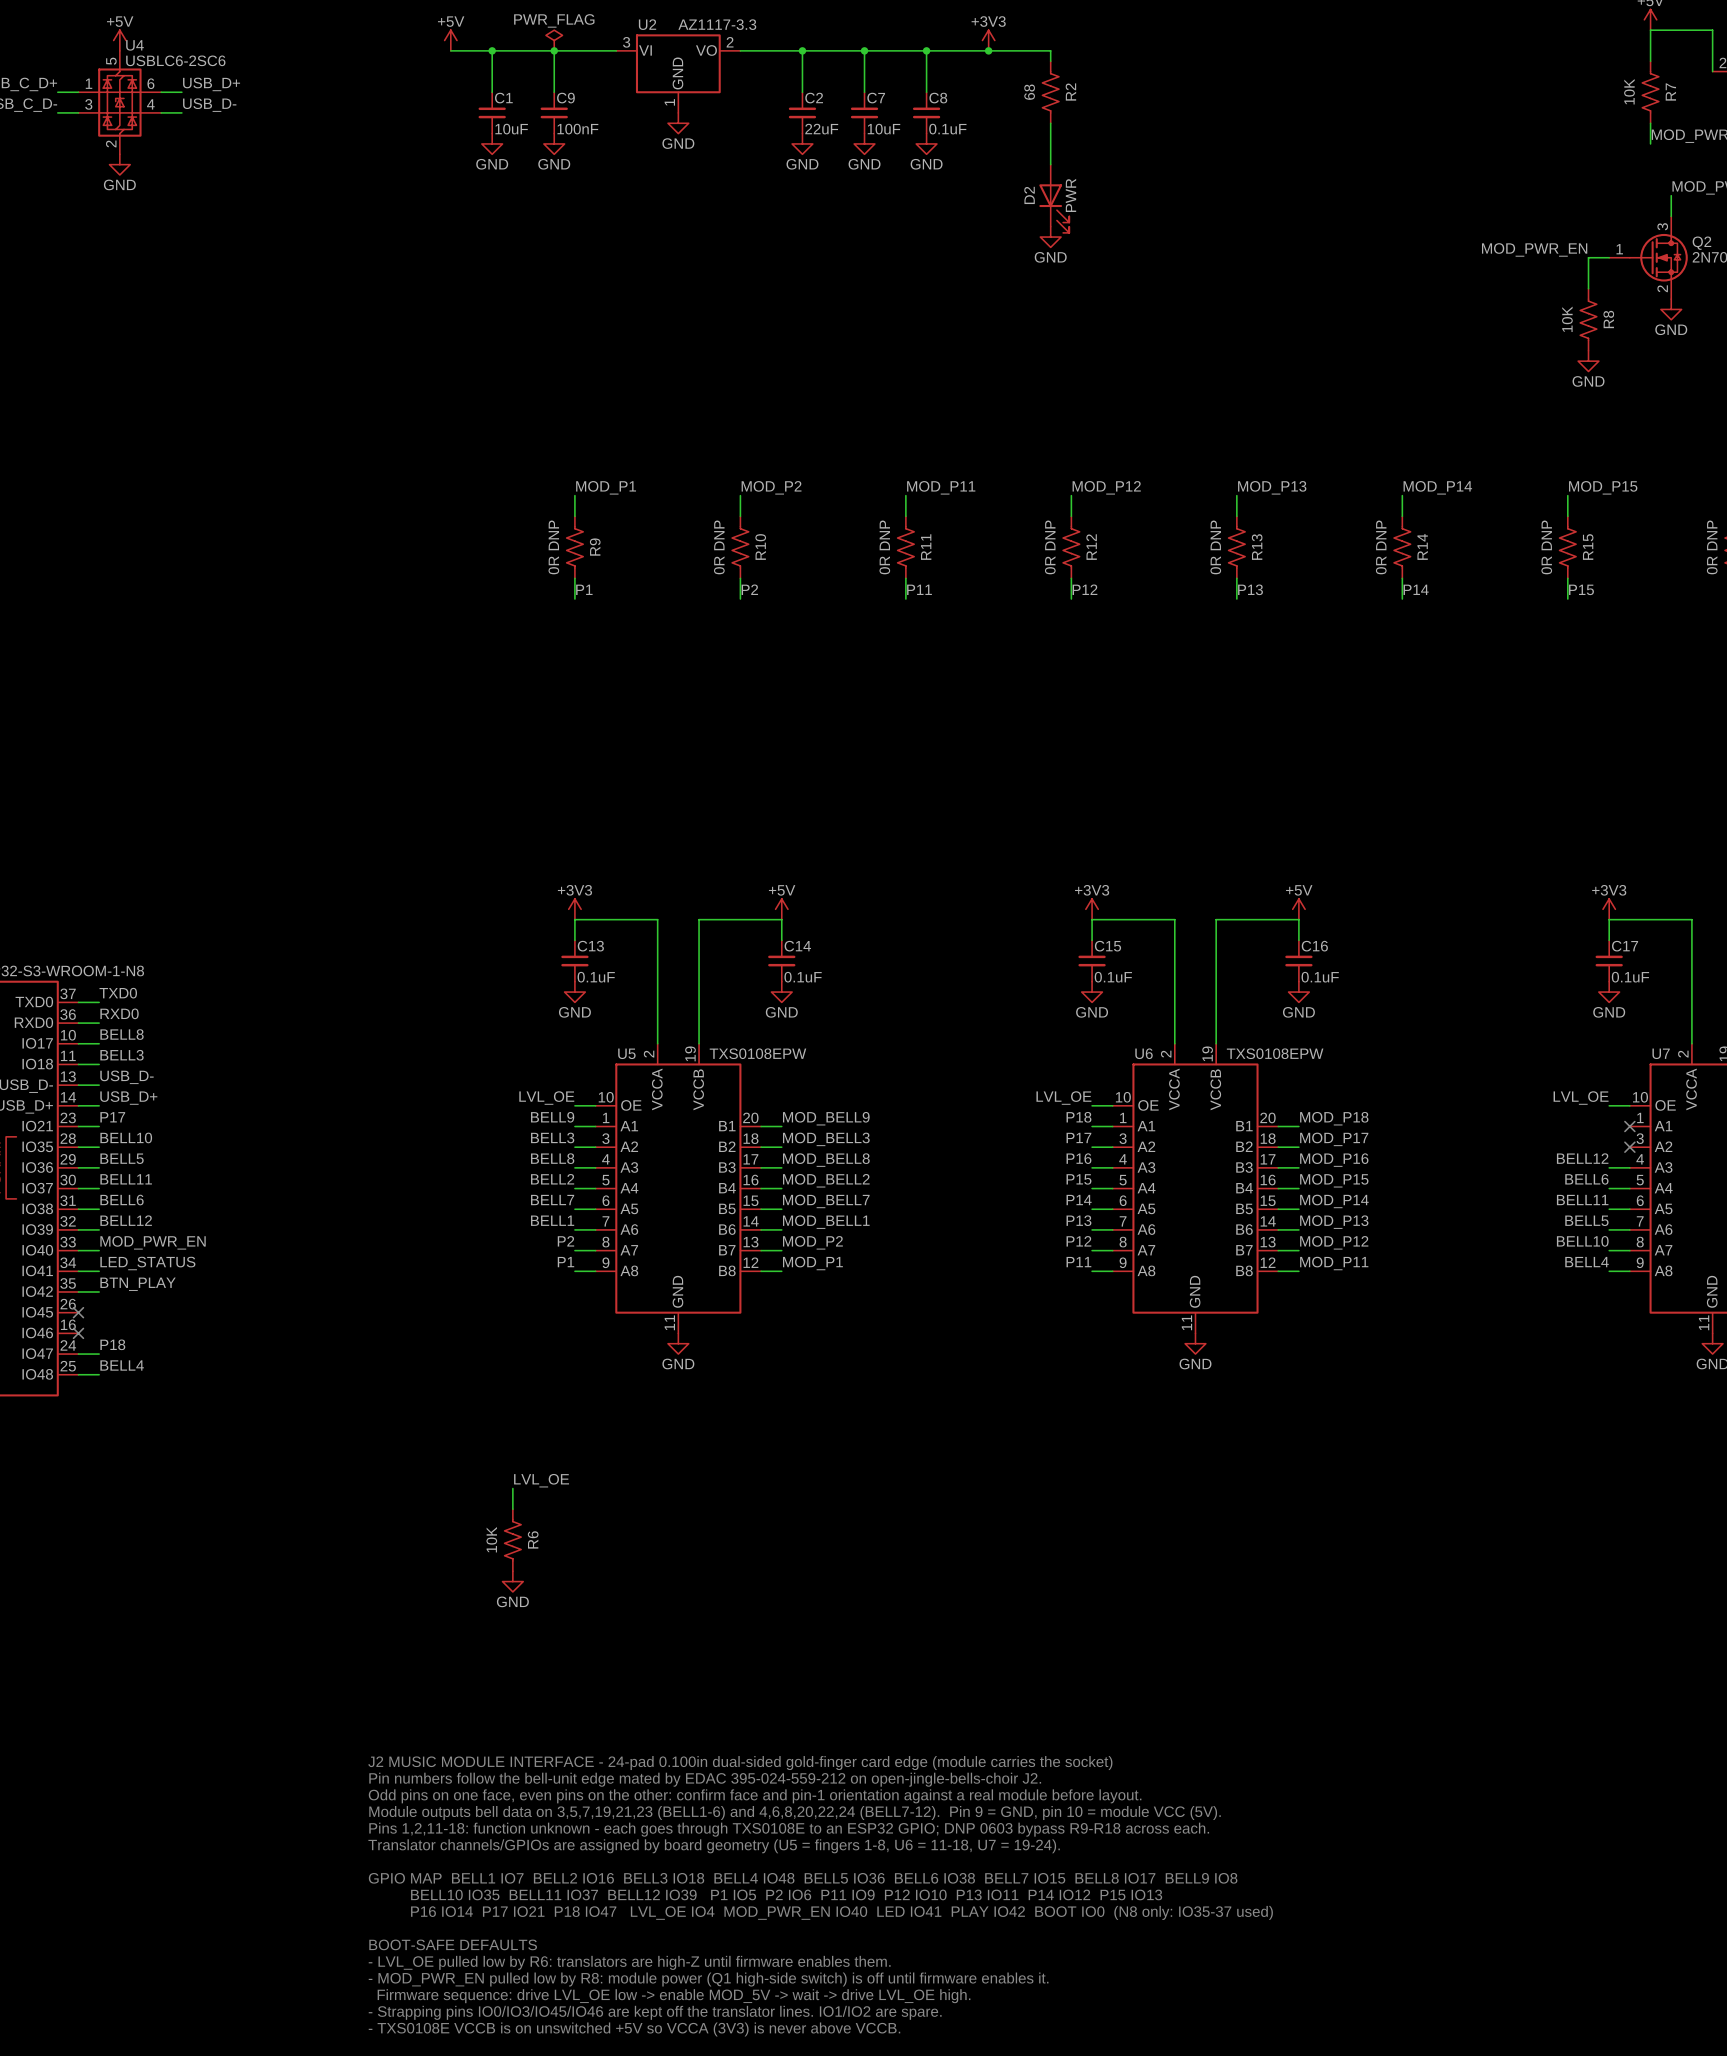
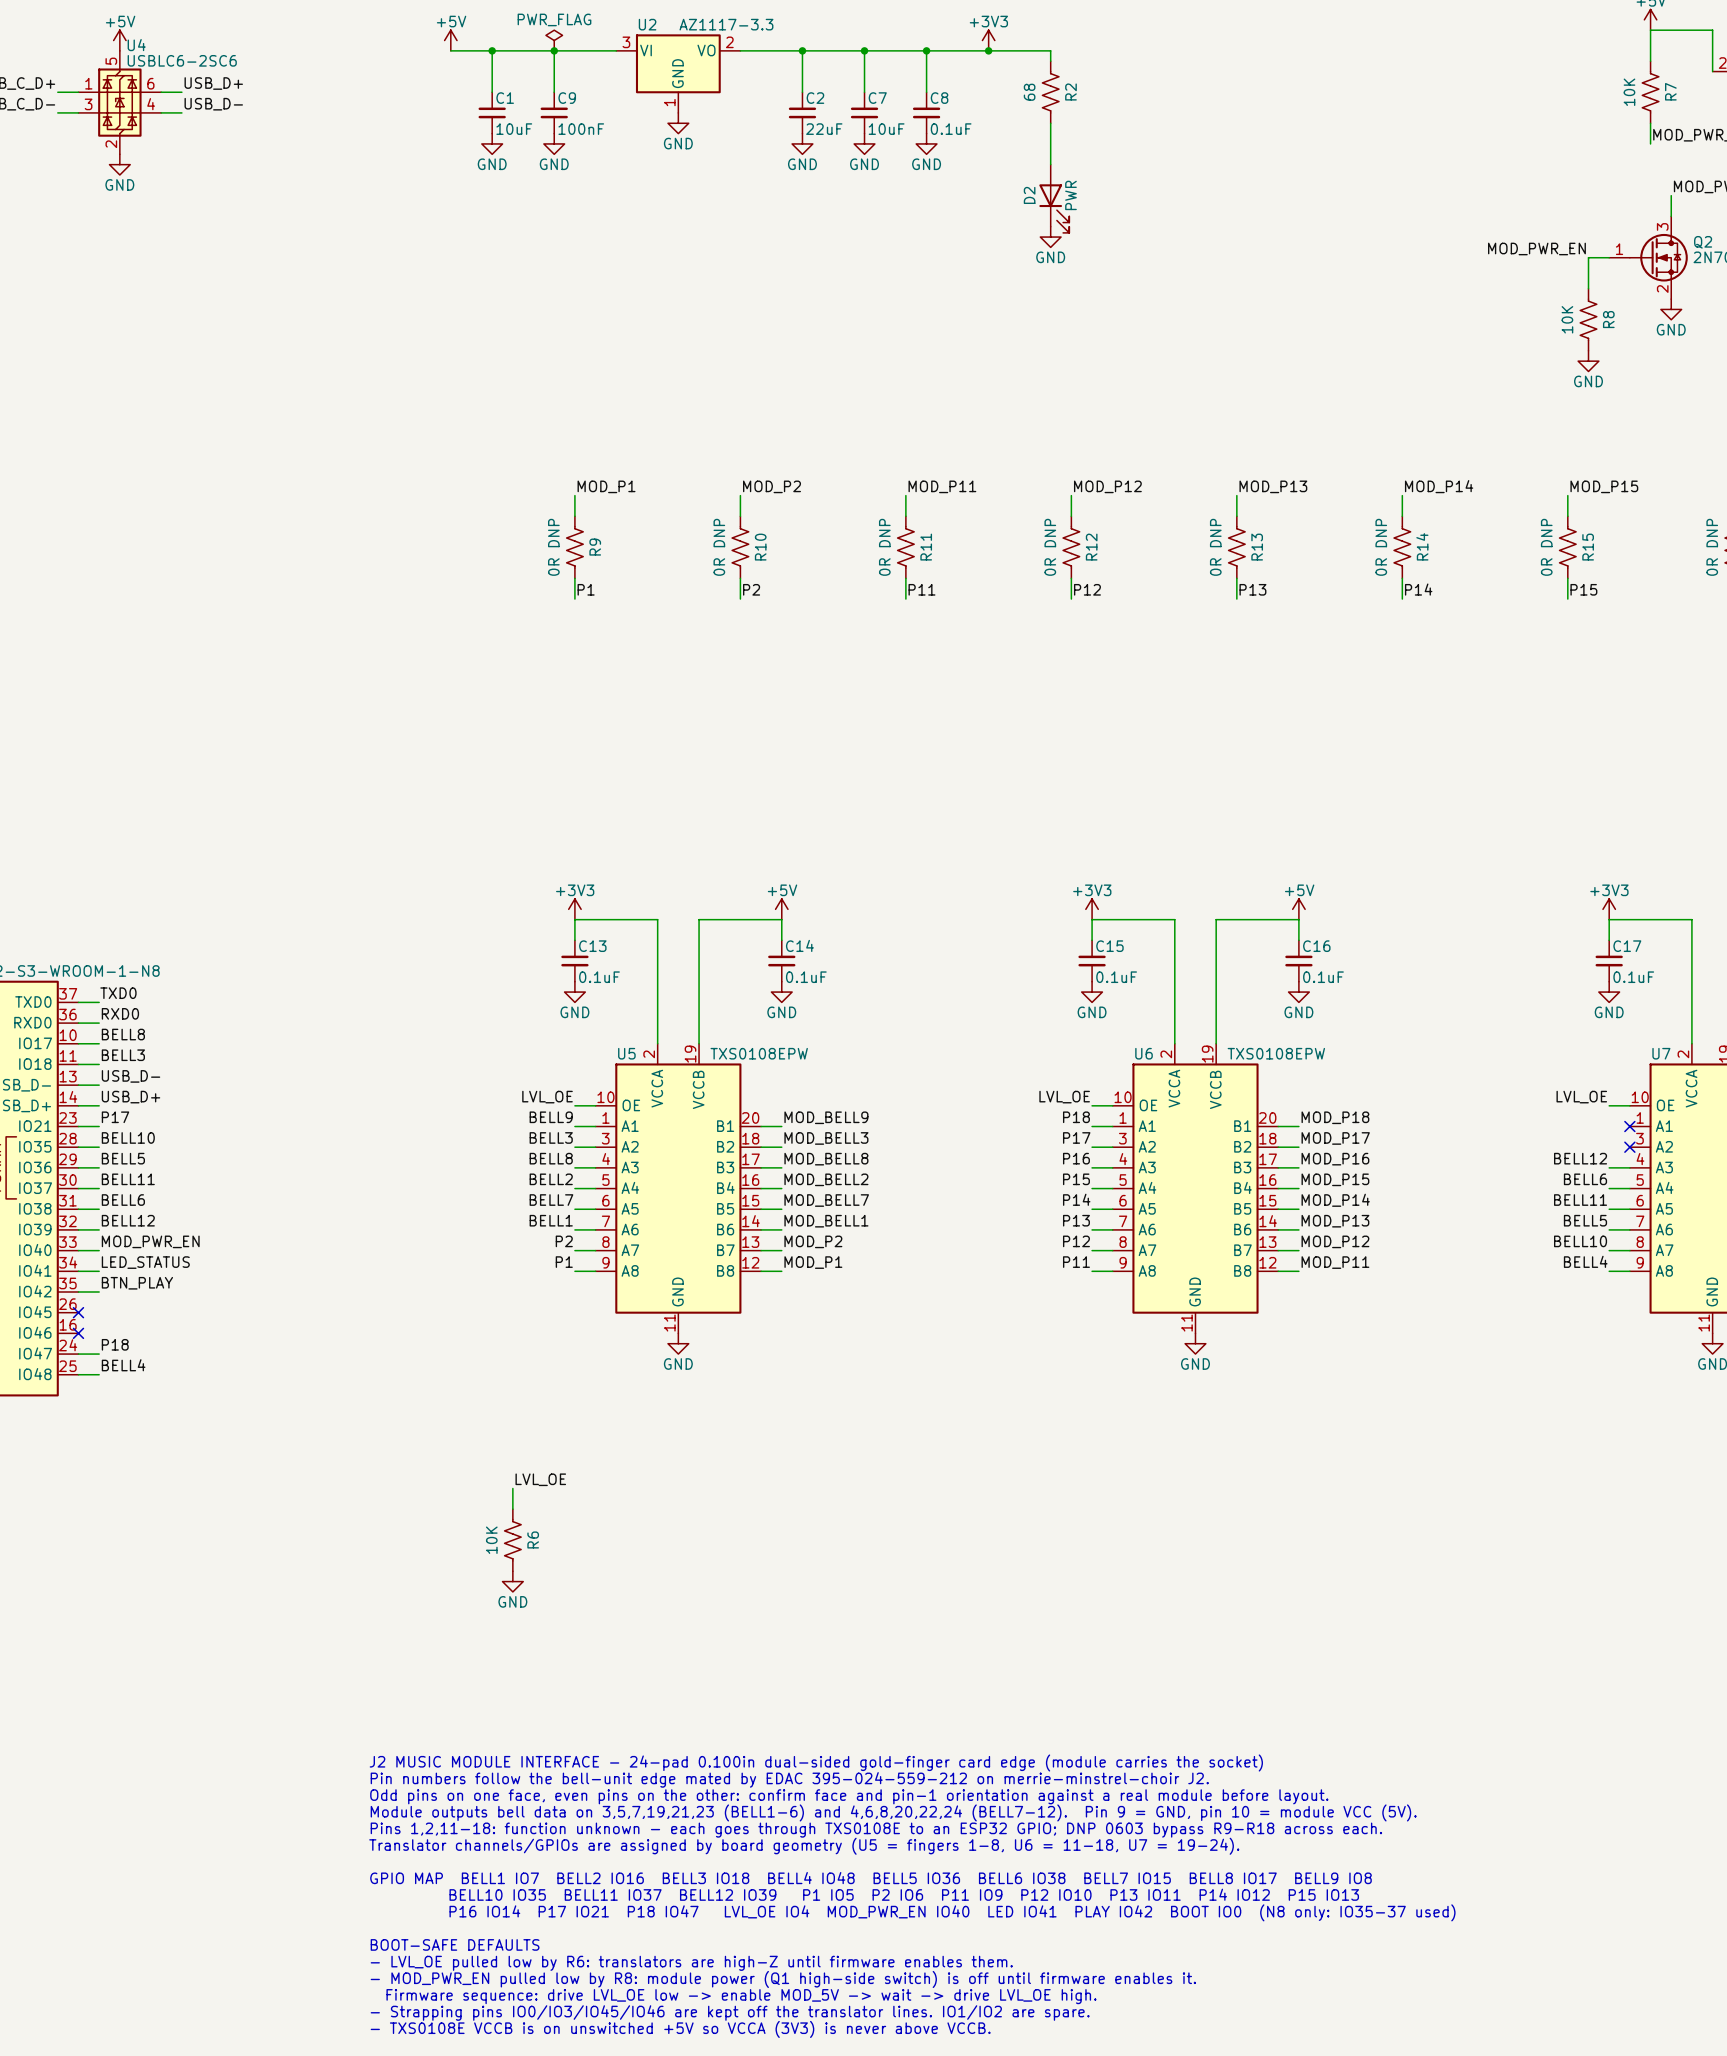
text: Pin numbers follow the bell-unit edge mated by EDAC 395-024-559-212 on open-jingle-bells-choir J2. (705, 1779) -> Pin numbers follow the bell-unit edge mated by EDAC 395-024-559-212 on merrie-minstrel-choir J2. (789, 1779)

